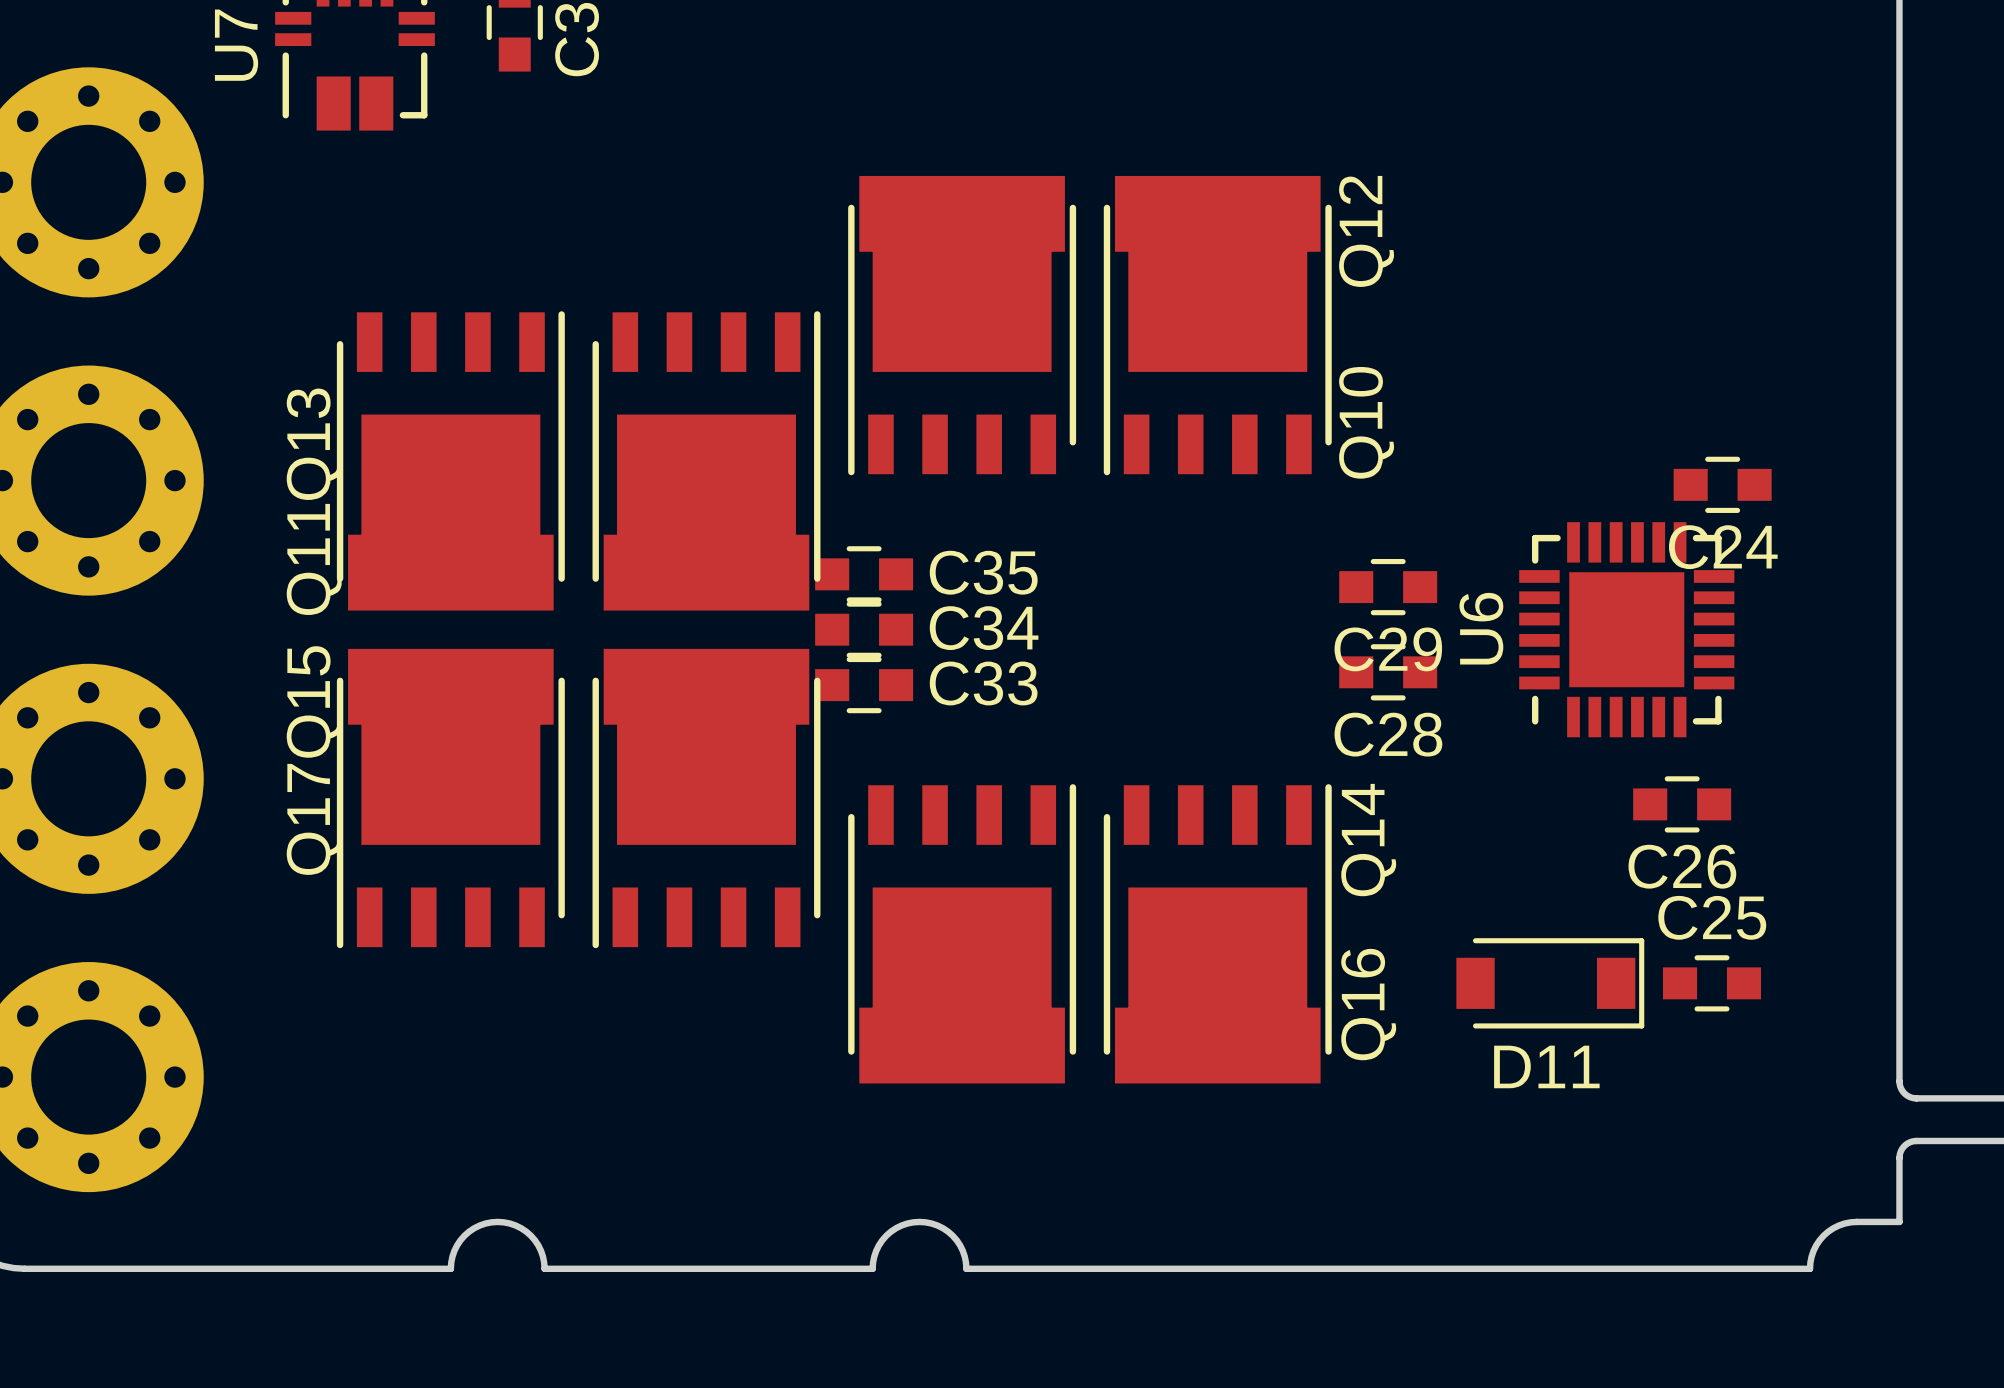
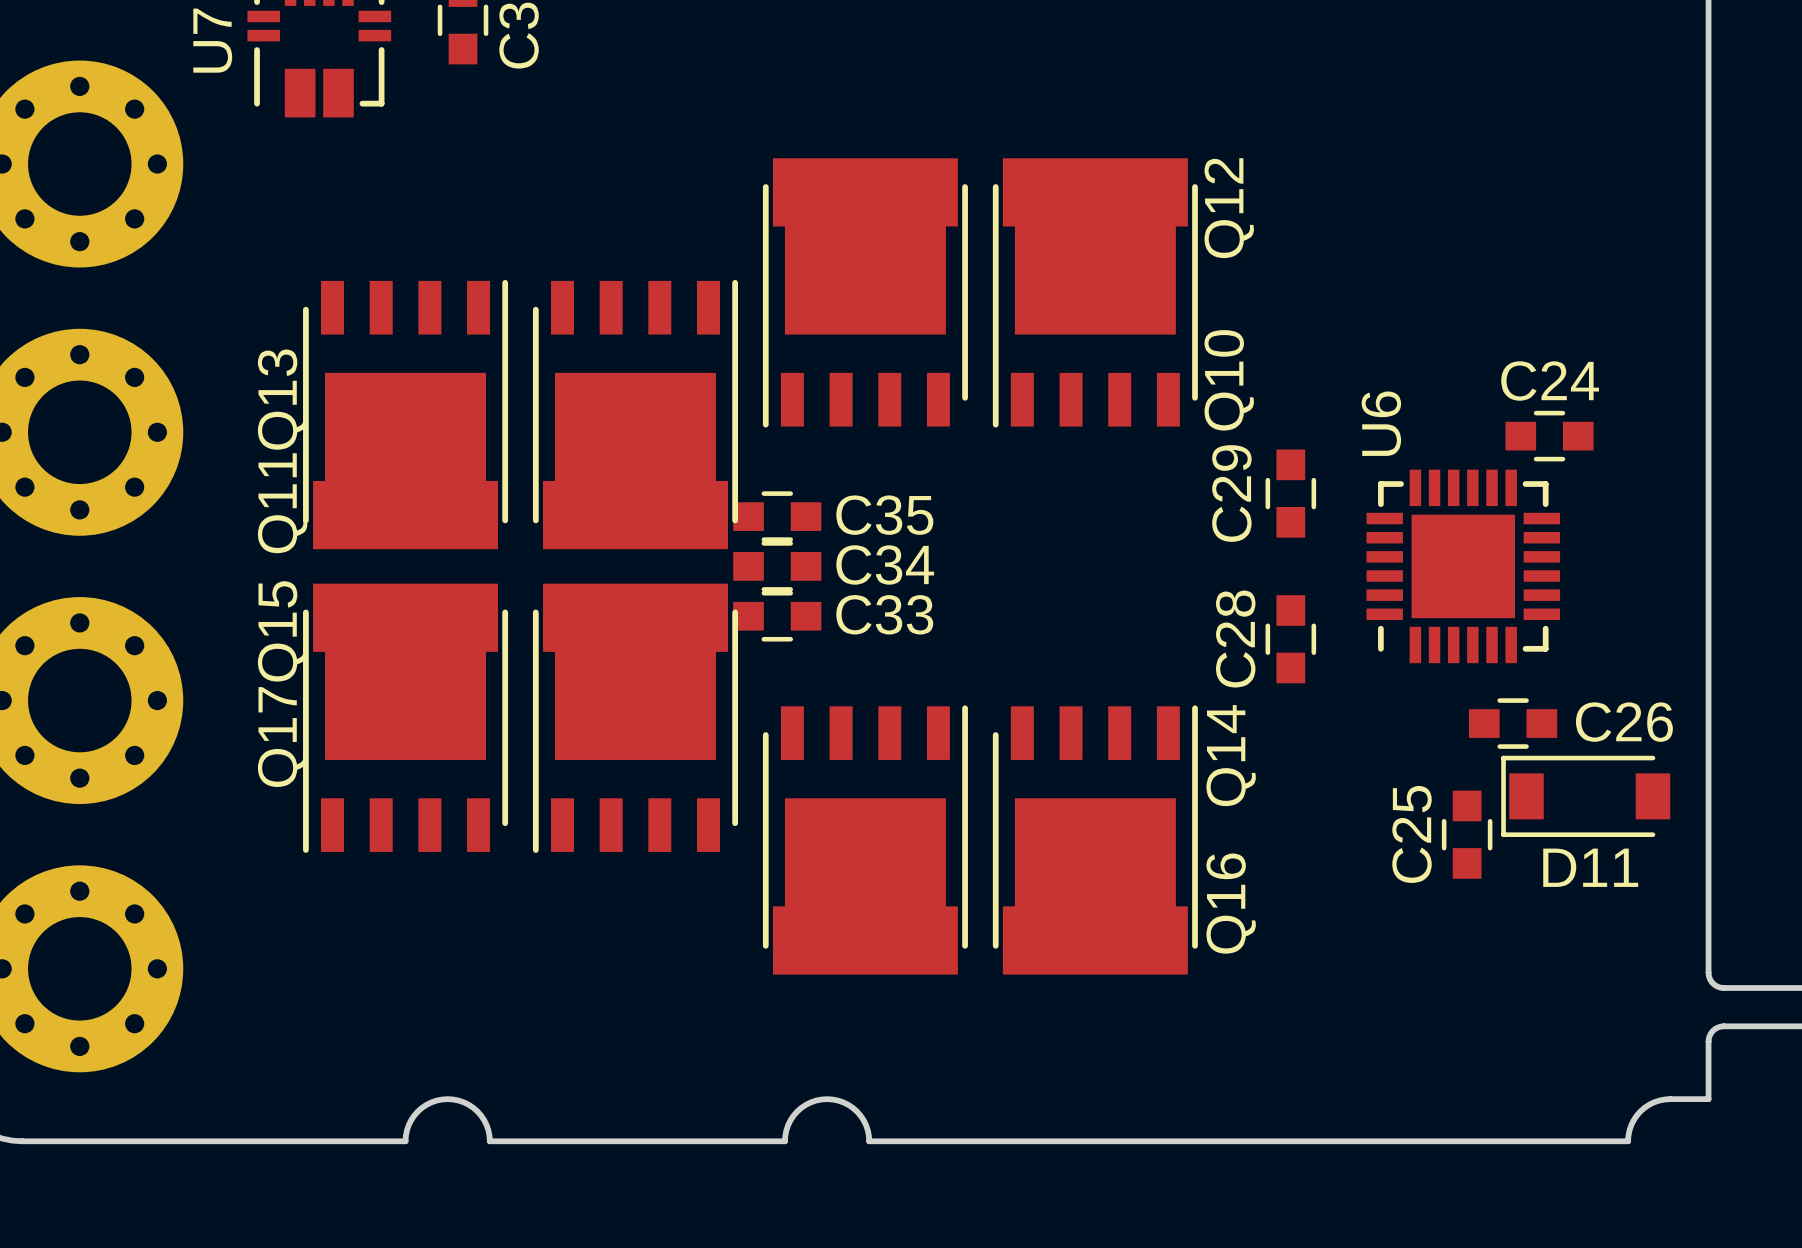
C24 name position: C24 (1723, 547) -> C24 (1550, 381)
C29 rotation: 0° (1388, 587) -> 90° clockwise (1290, 493)
C29 position: (1388, 587) -> (1290, 493)
U6 name position: U6 (1481, 628) -> U6 (1381, 423)
C28 rotation: 0° (1388, 672) -> 90° clockwise (1290, 639)
C28 position: (1388, 672) -> (1290, 639)
C26 name position: C26 (1682, 866) -> C26 (1624, 722)
C25 name position: C25 (1712, 917) -> C25 (1412, 834)
D11 rotation: 0° (1550, 983) -> 180° (1585, 796)
D11 position: (1550, 983) -> (1585, 796)
C25 rotation: 0° (1712, 983) -> 90° clockwise (1467, 834)
C25 position: (1712, 983) -> (1467, 834)

